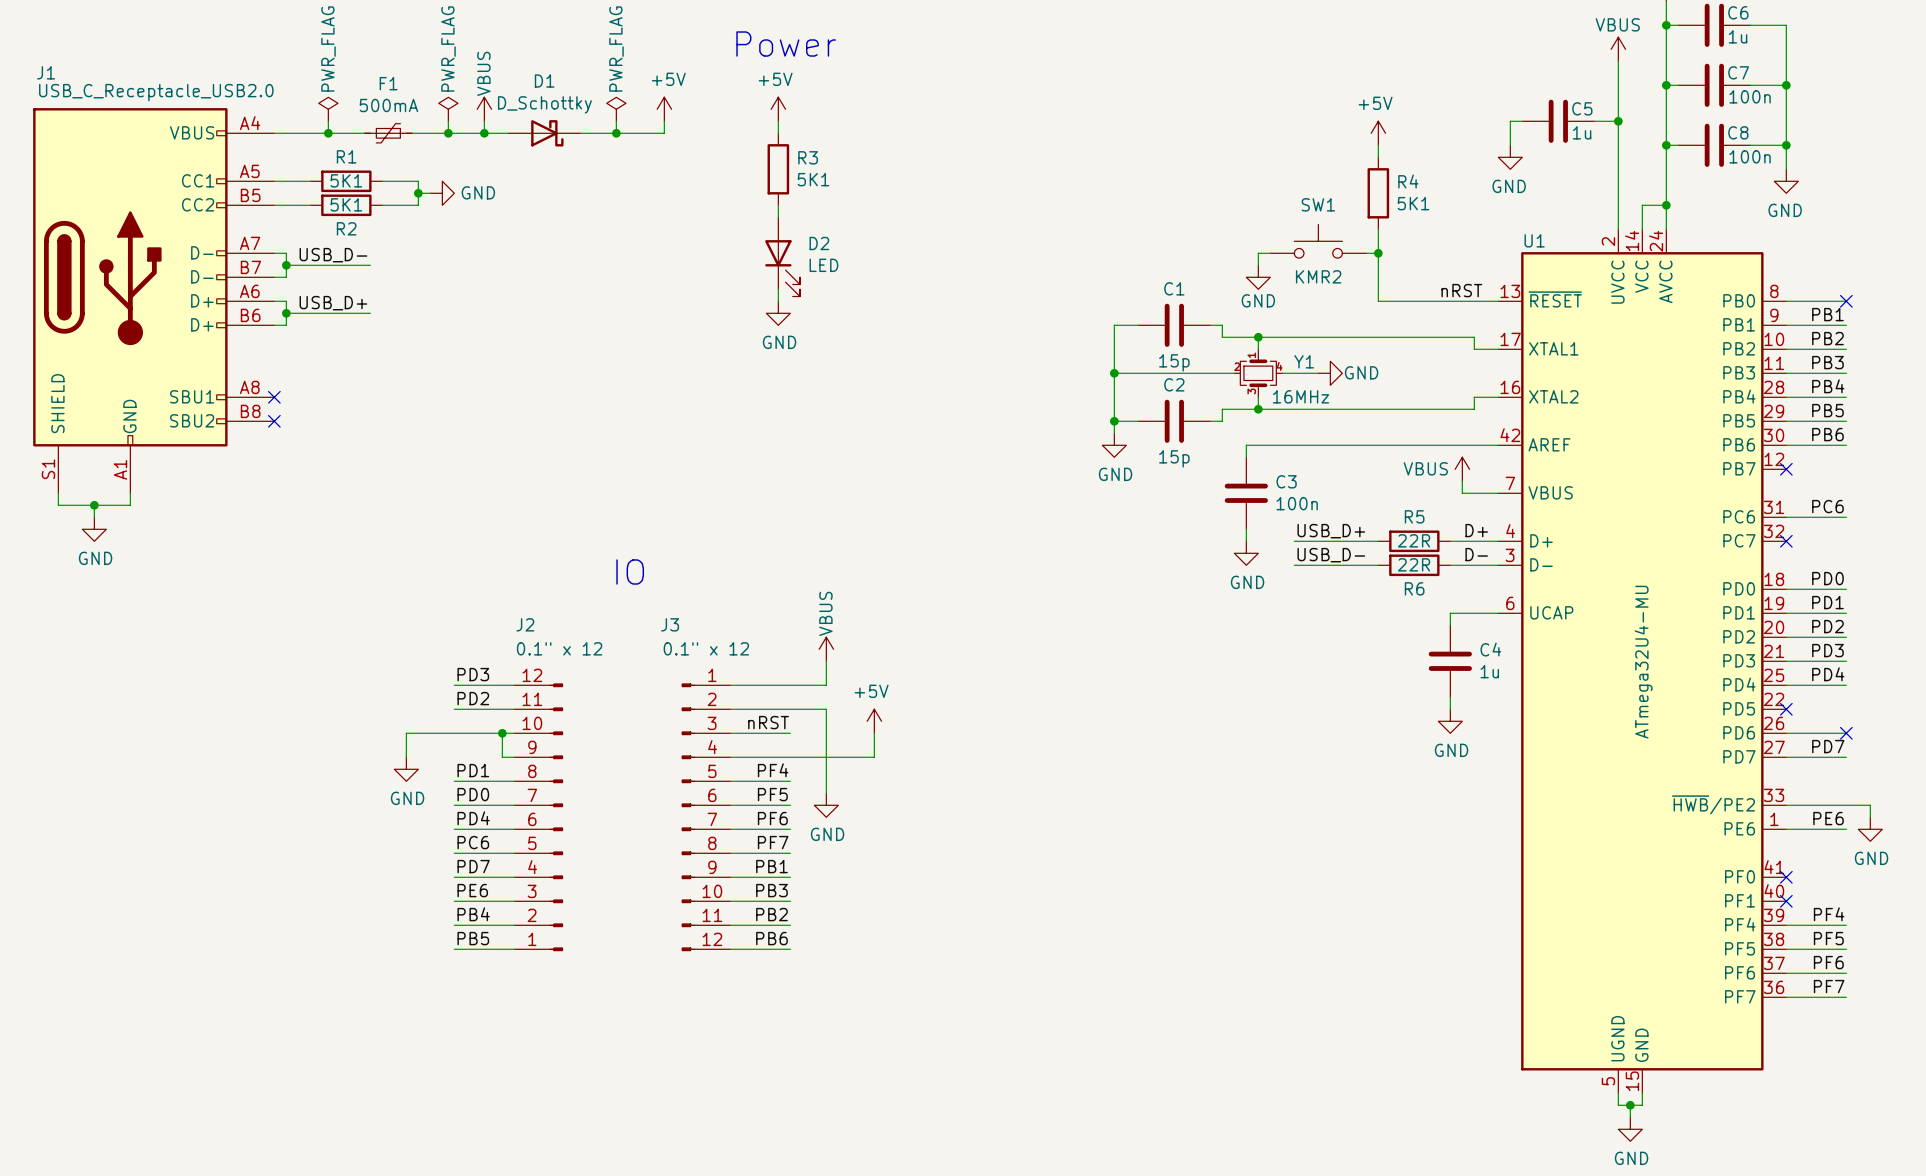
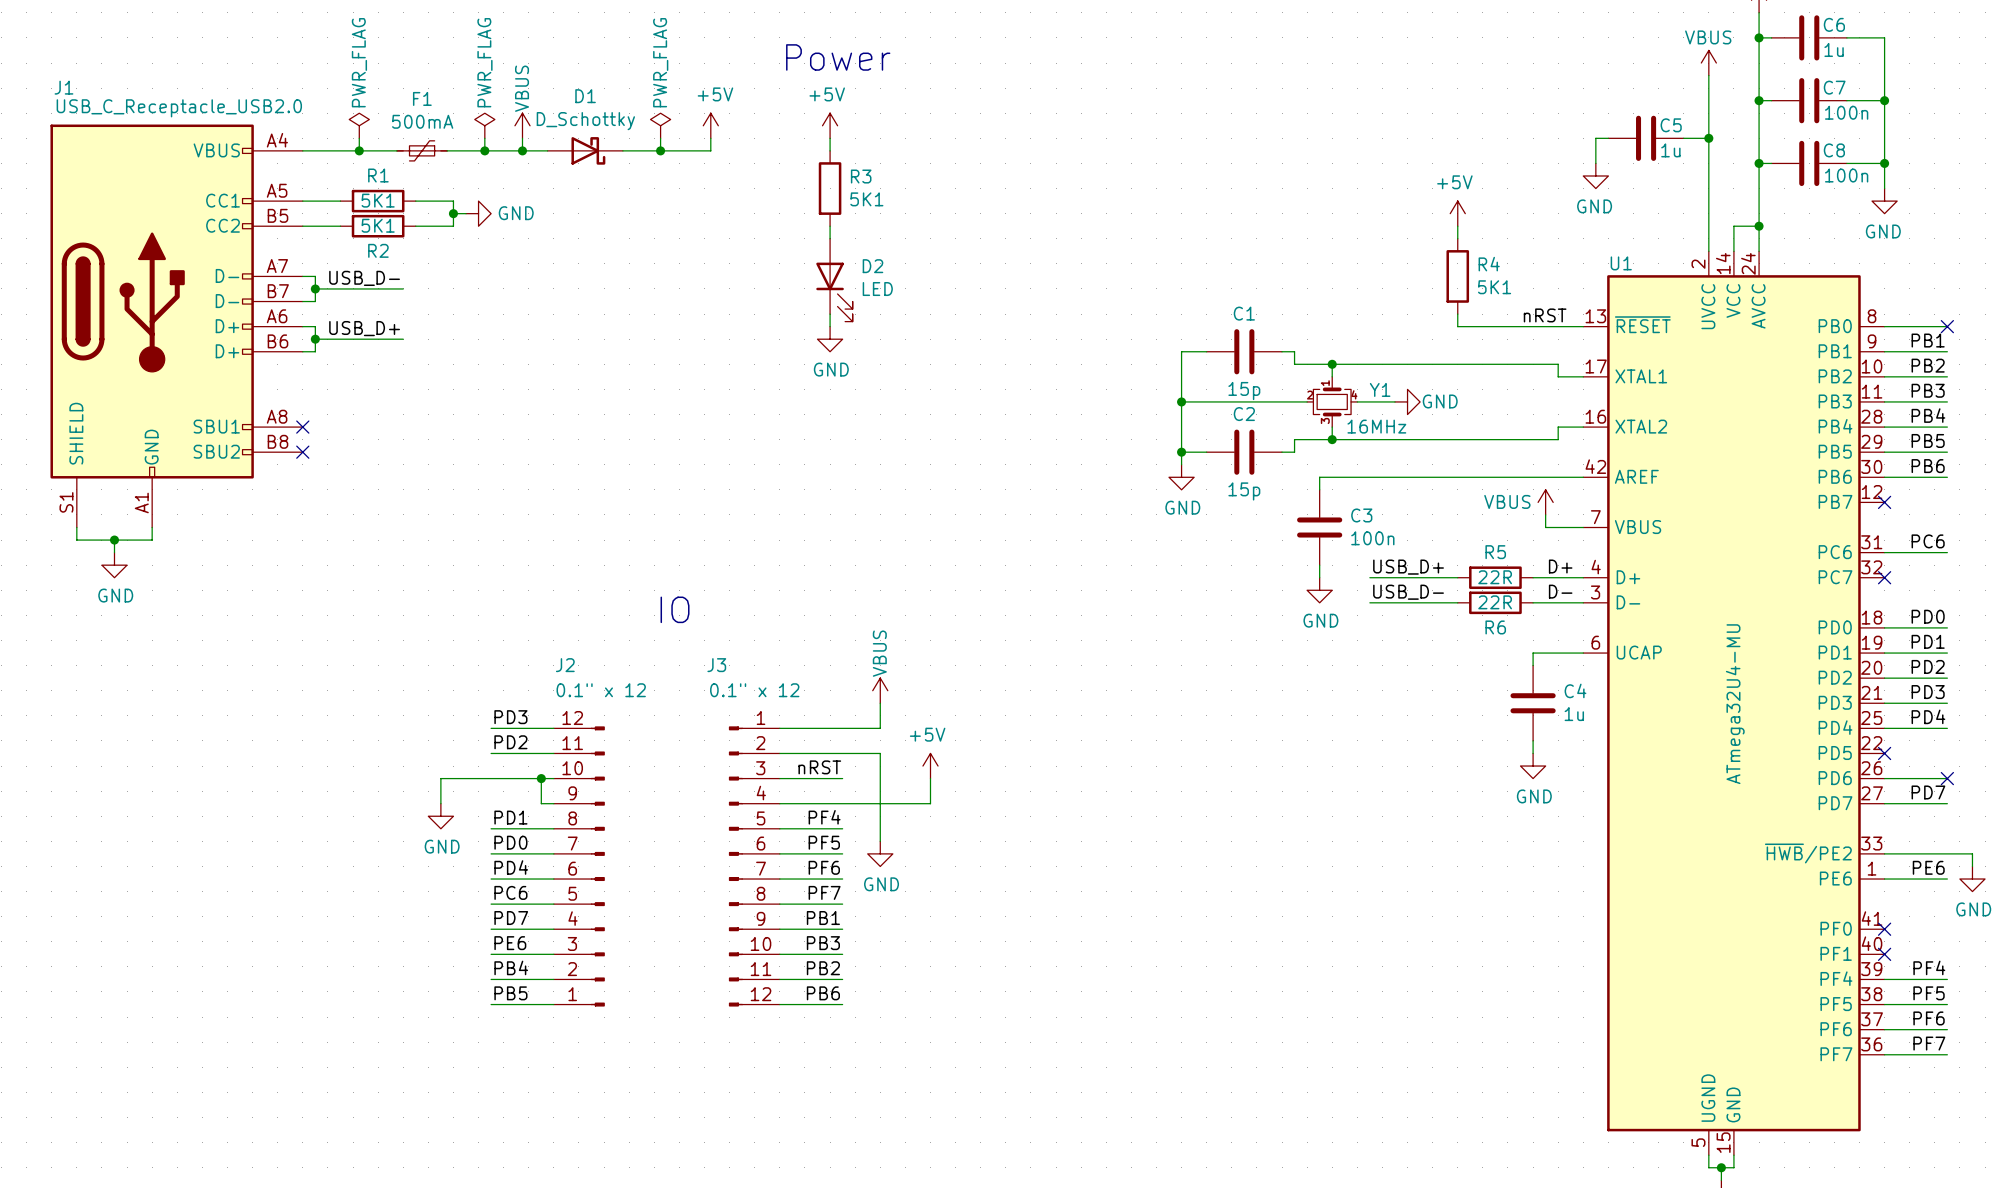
power symbol position: +5V (1378, 133) -> +5V (1457, 213)
wire: (1378, 145) (1378, 157) -> (1457, 226) (1457, 238)
R4 position: (1378, 193) -> (1457, 276)
wire: (1378, 229) (1378, 289) -> none
SW1: KMR2 (1318, 241) -> none
wire: (1270, 253) (1258, 253) (1258, 265) -> none
wire: (1366, 253) (1378, 253) -> none
junction: (1378, 253) -> none
power symbol: GND (1258, 277) -> none

